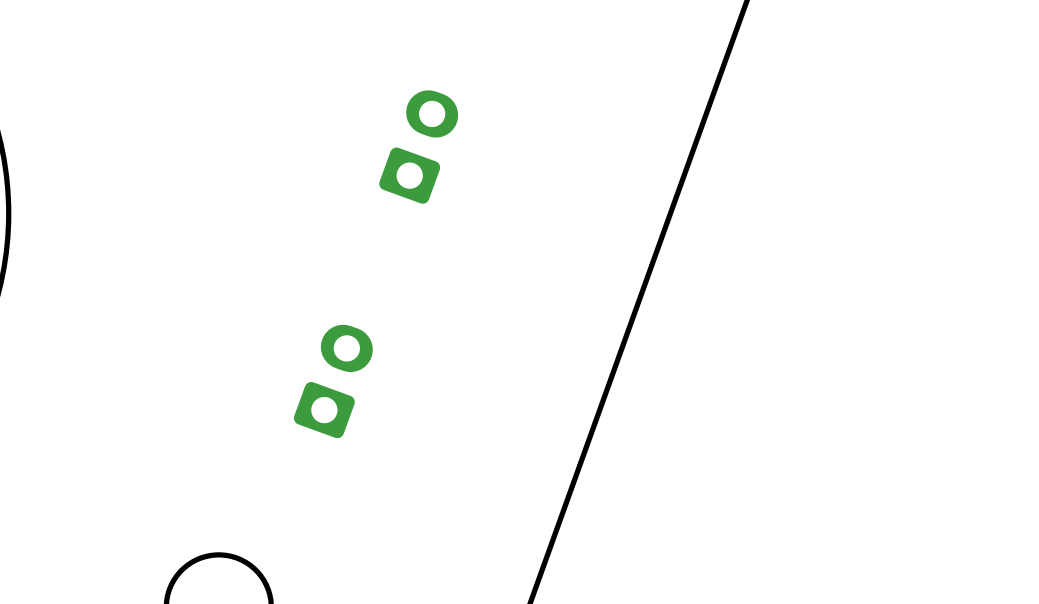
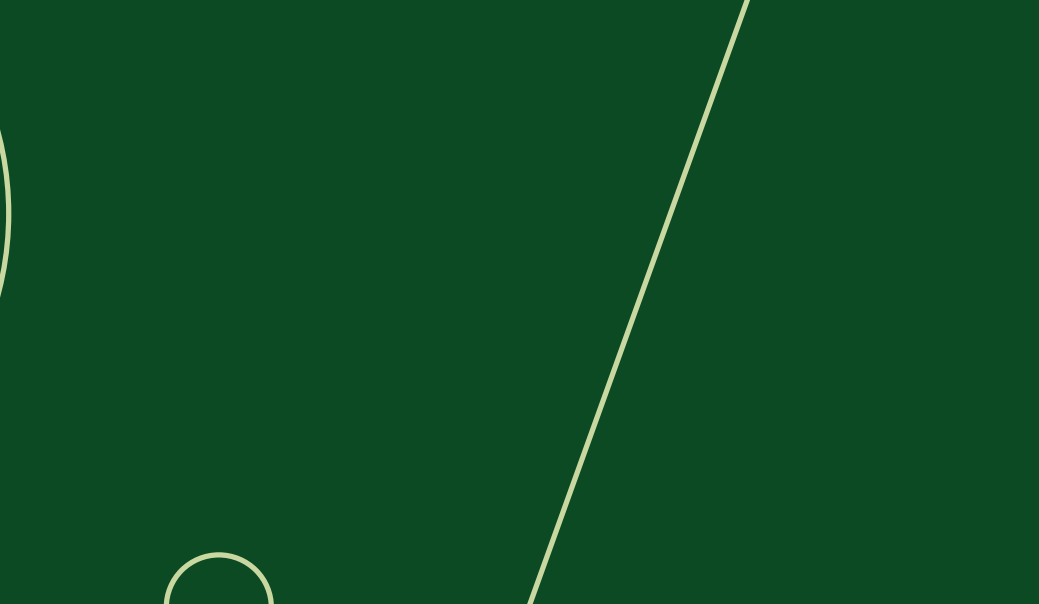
part: (418, 147) -> none
part: (333, 381) -> none

